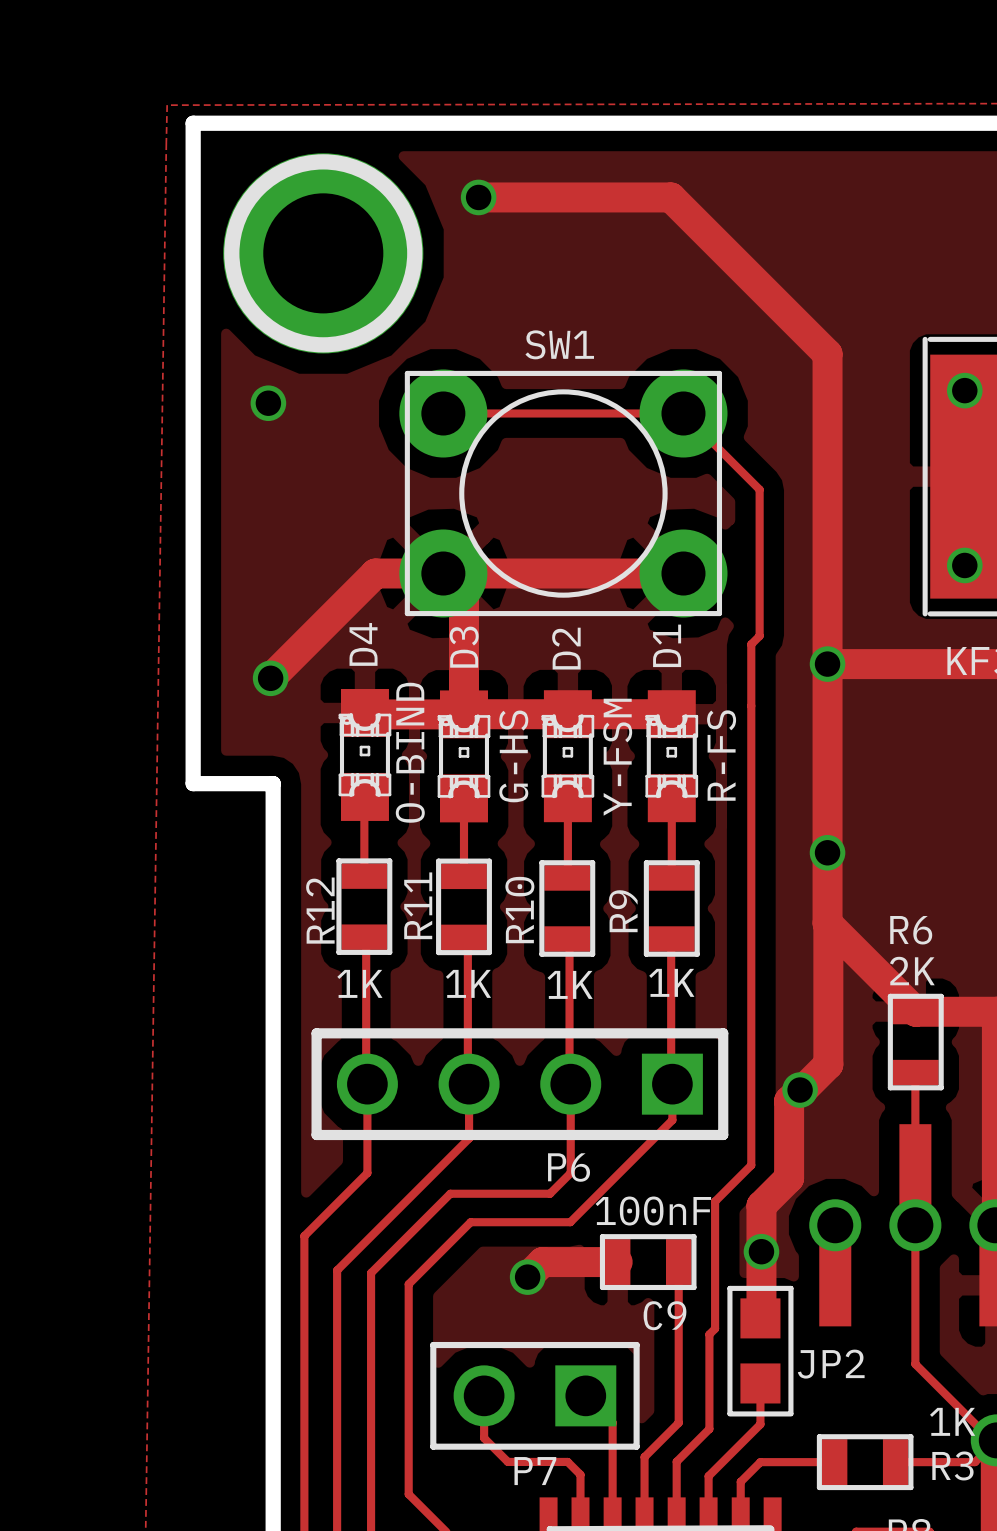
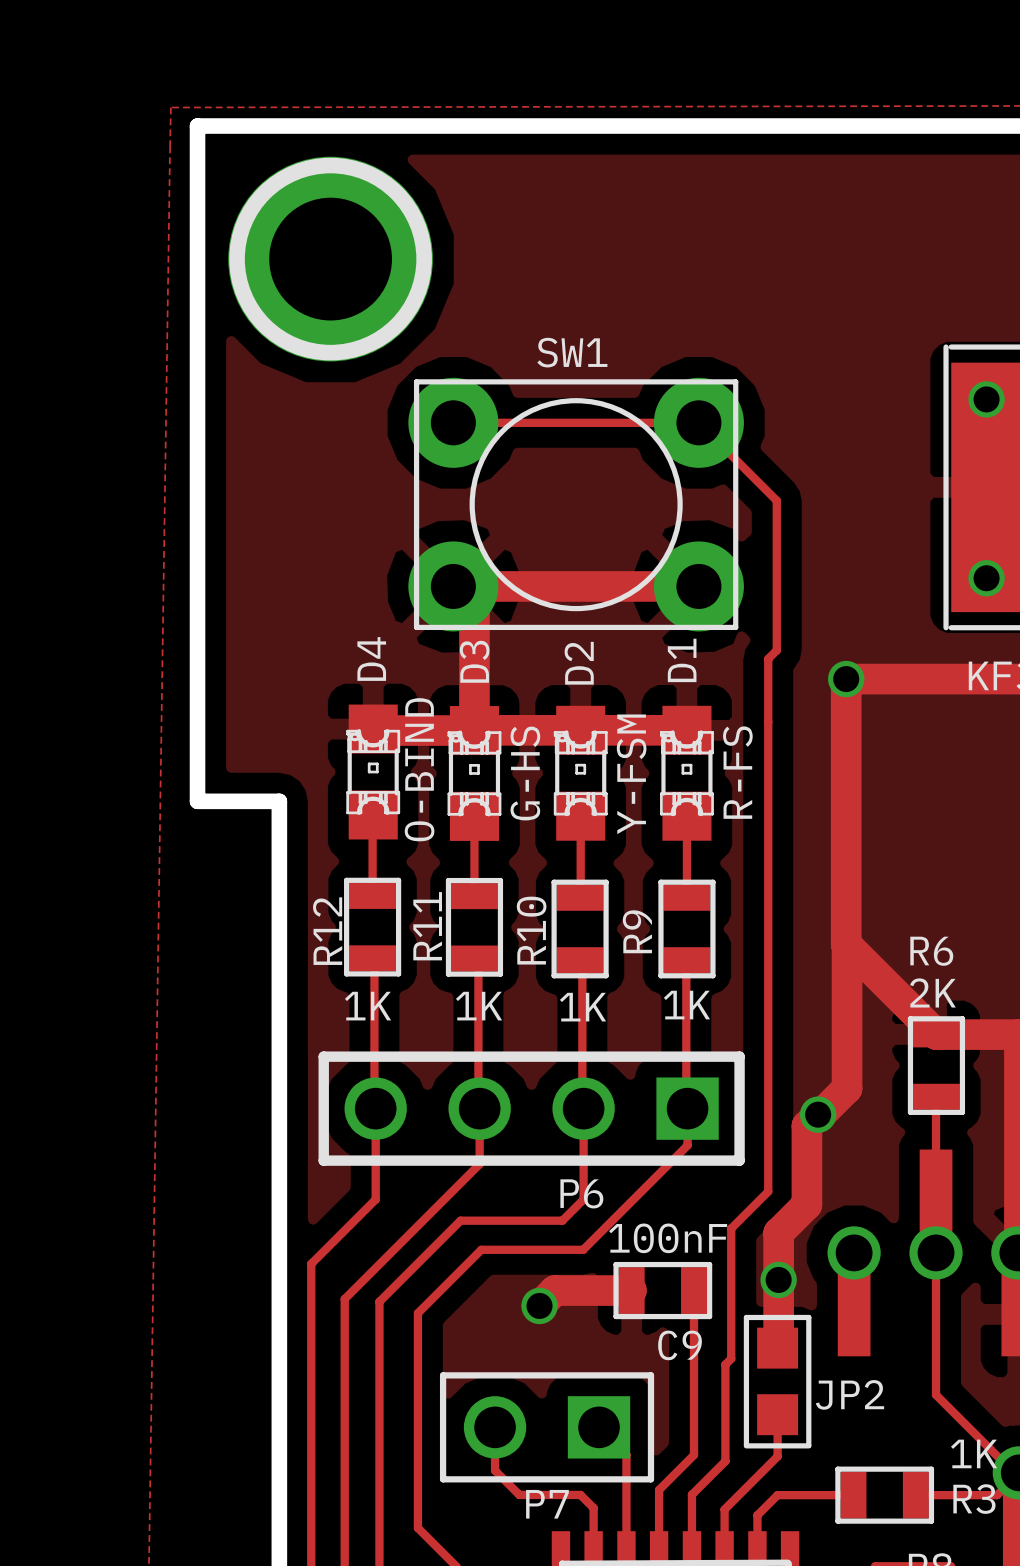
track: (478, 197) (670, 197) (827, 354) (827, 664) -> none
via: (478, 197) -> none
via: (268, 403) -> none
track: (443, 573) (375, 573) (270, 678) -> none
via: (270, 678) -> none
via: (827, 852) -> none

